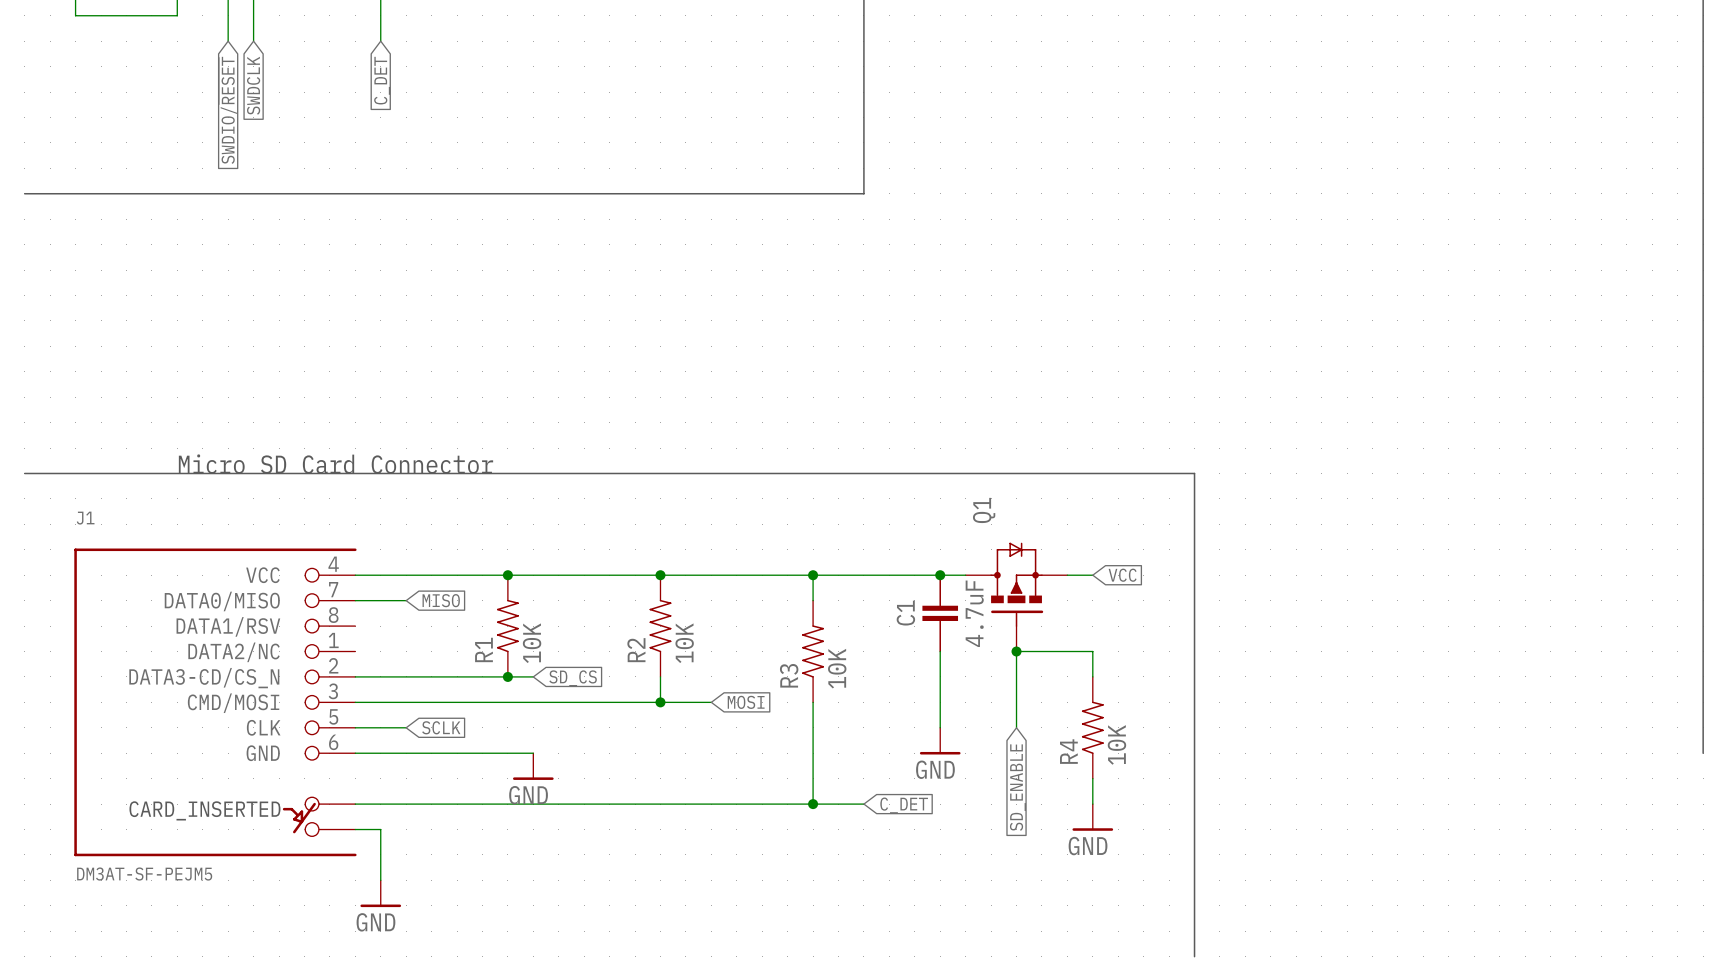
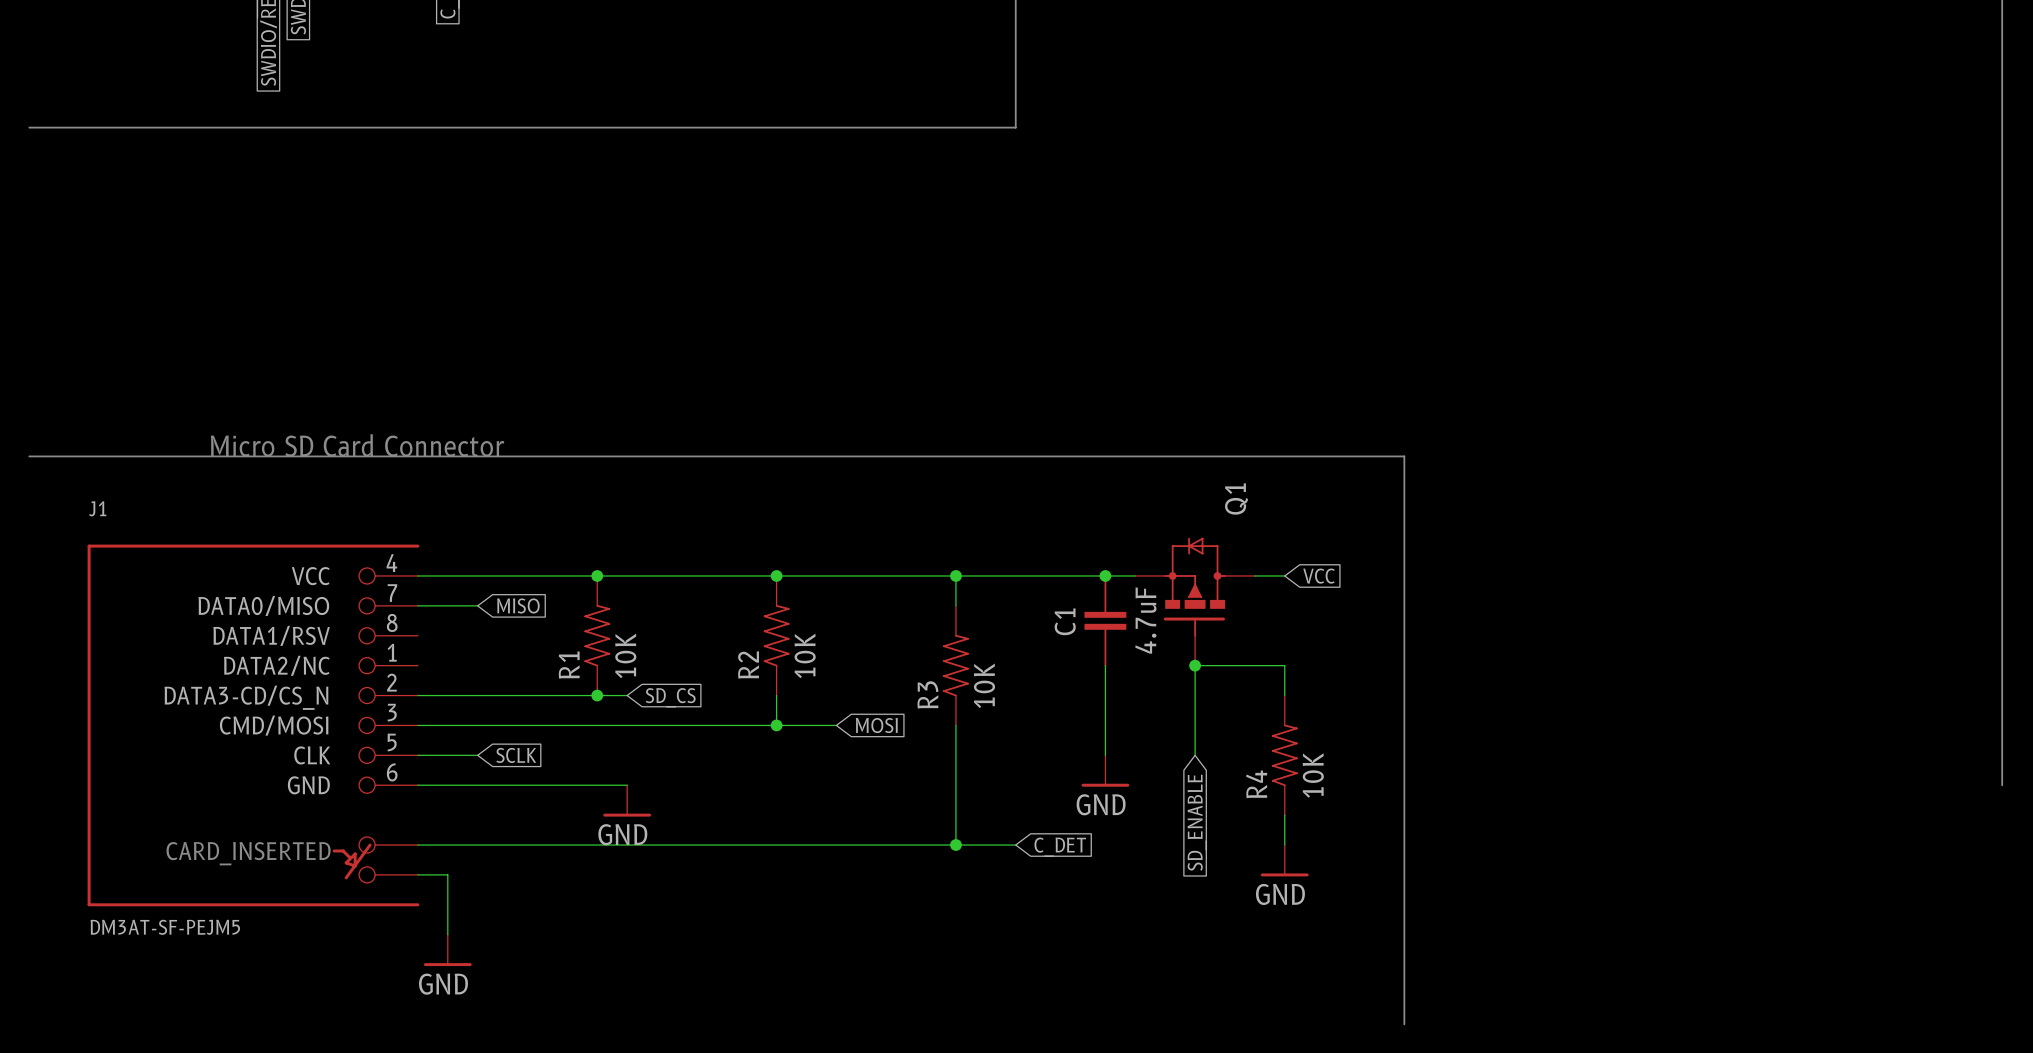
Q1 flip: as is (1016, 584) -> left-right (1194, 587)

